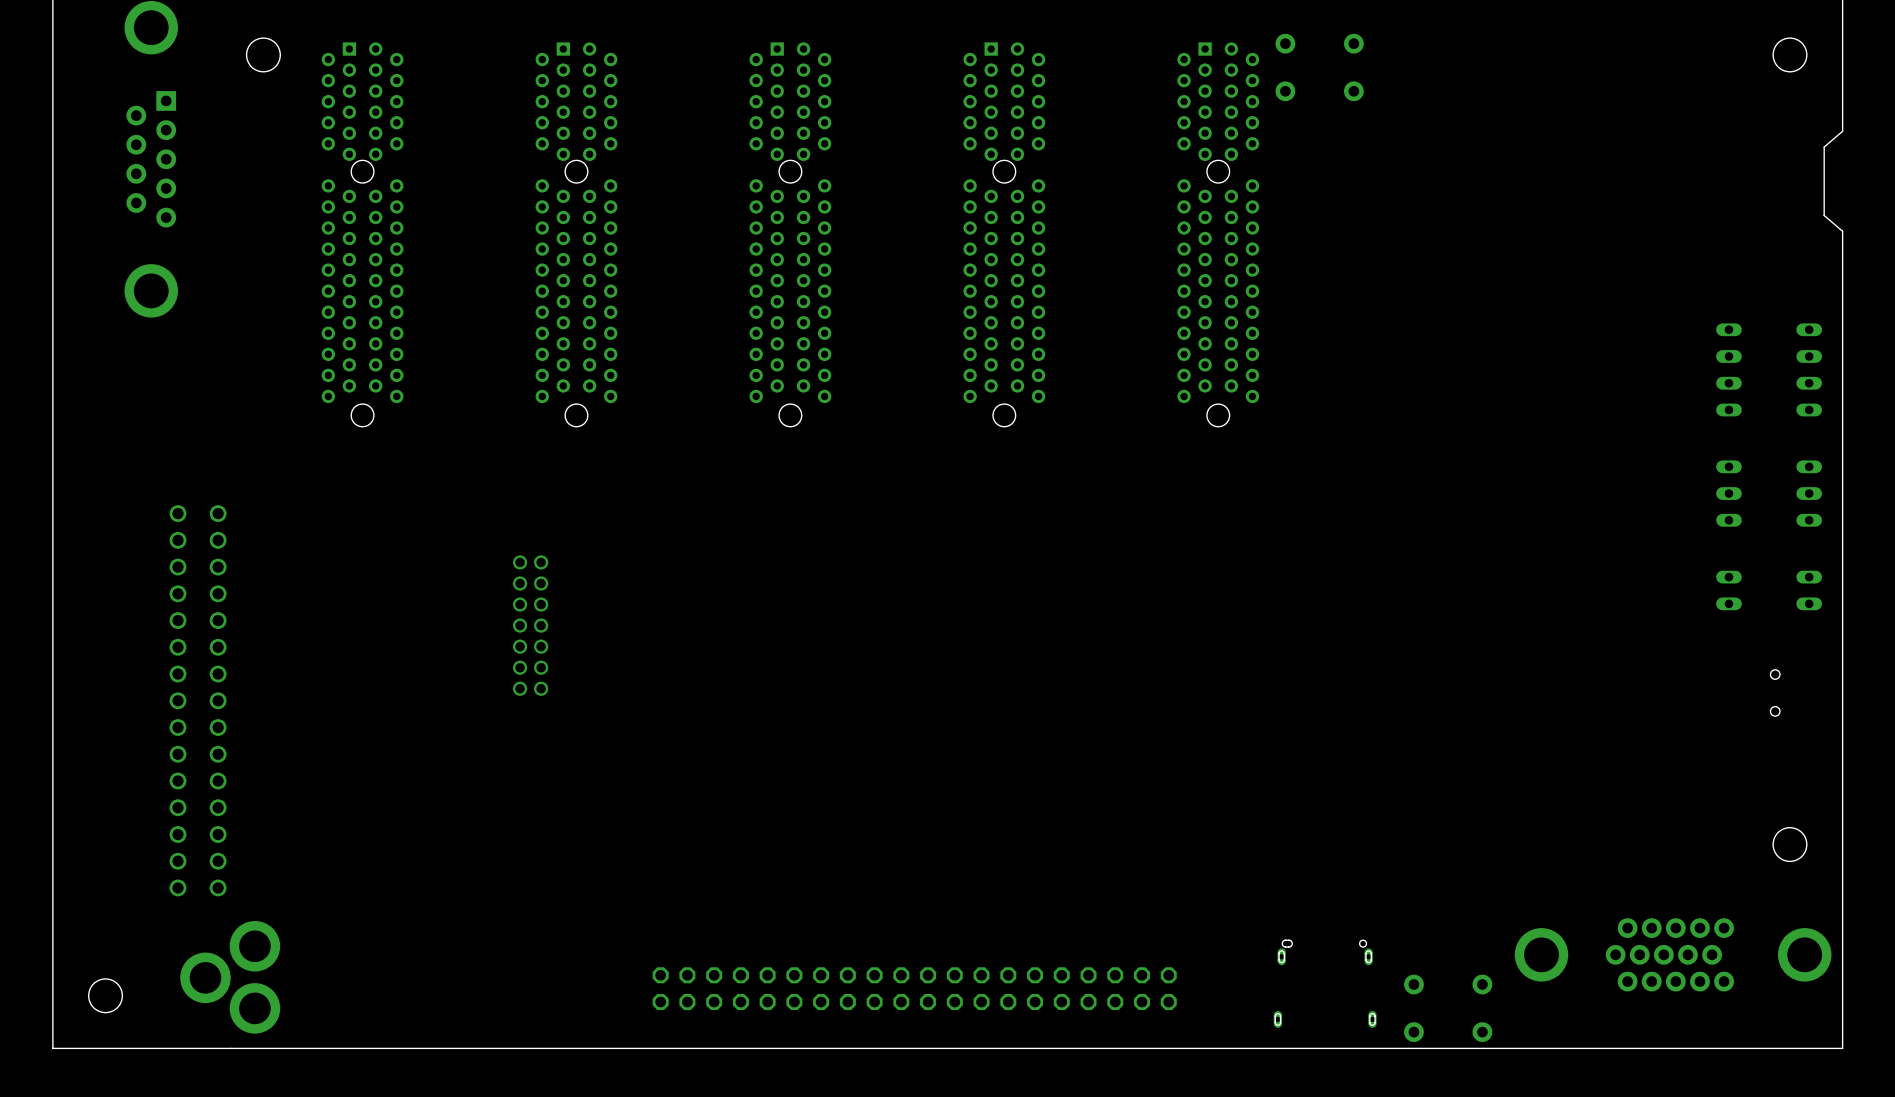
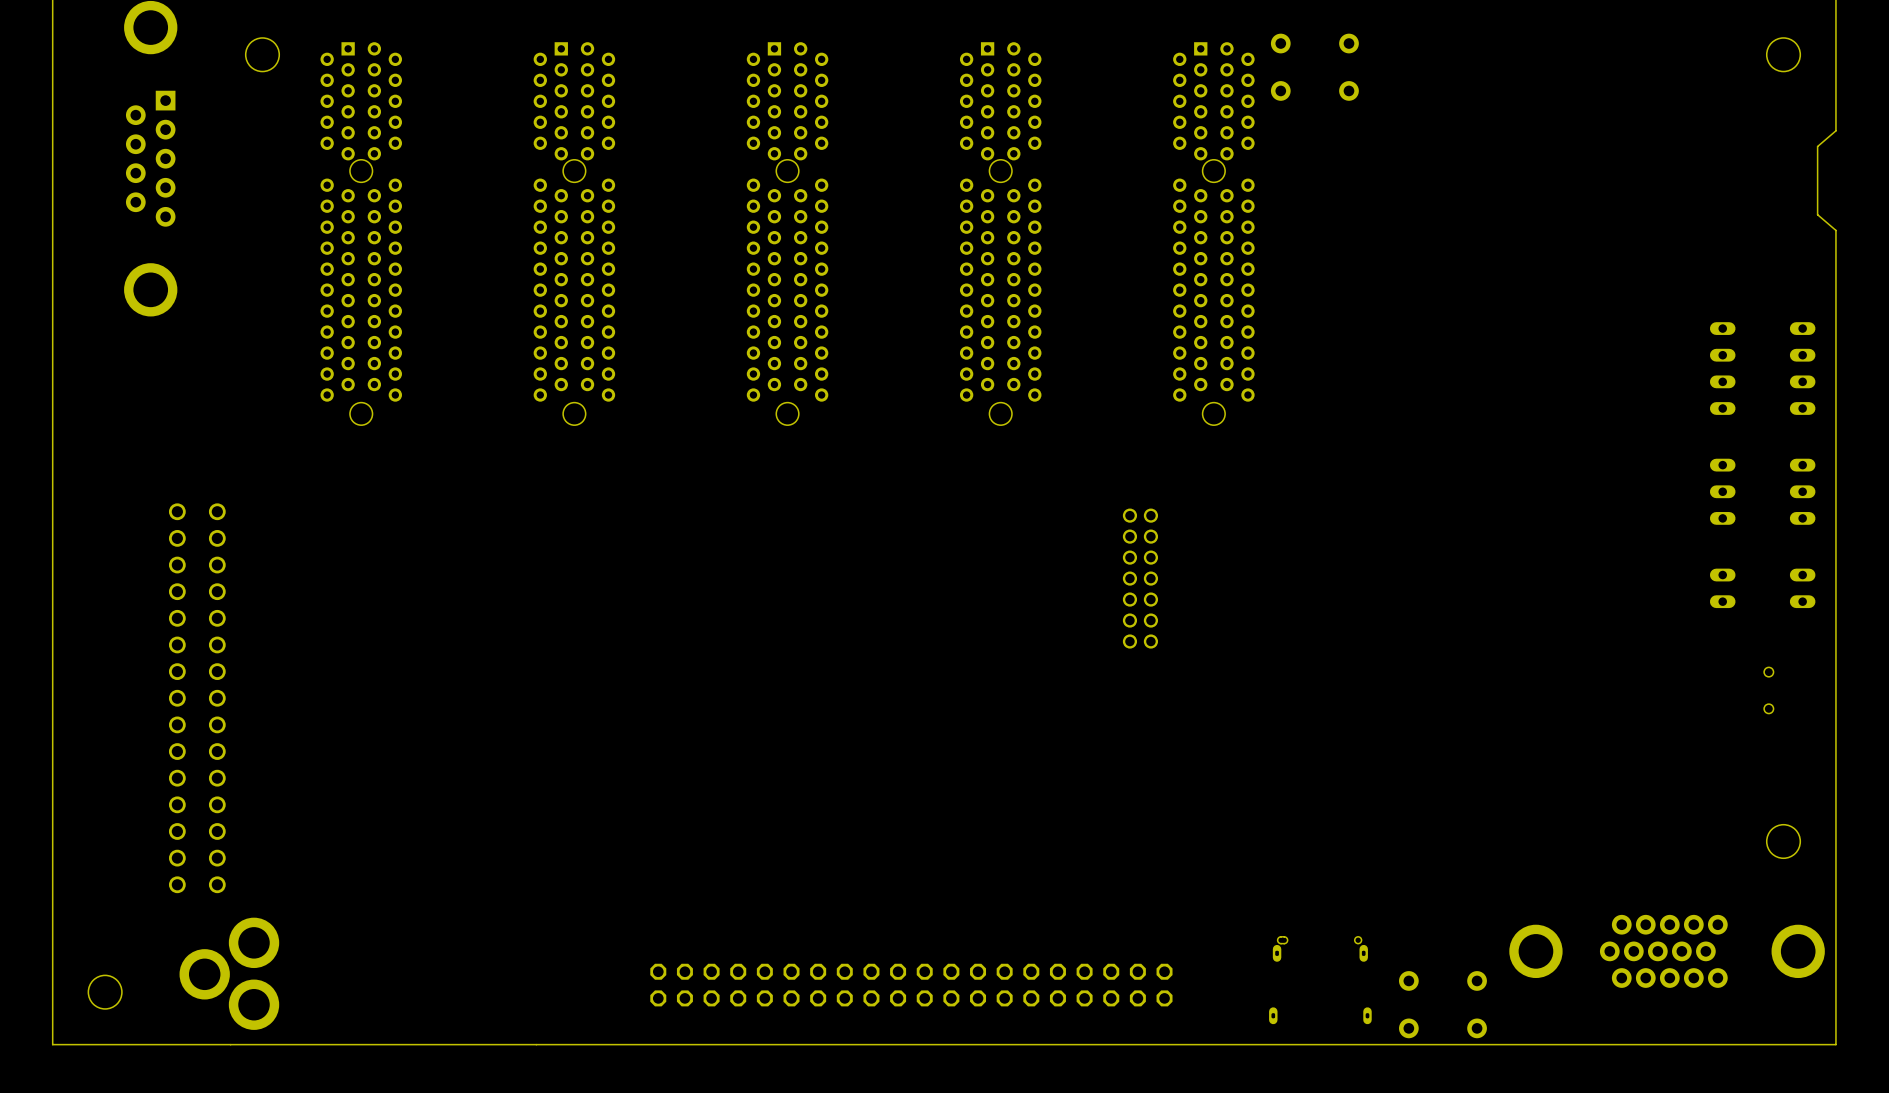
part: none -> (1140, 578)
part: (530, 625) -> none

